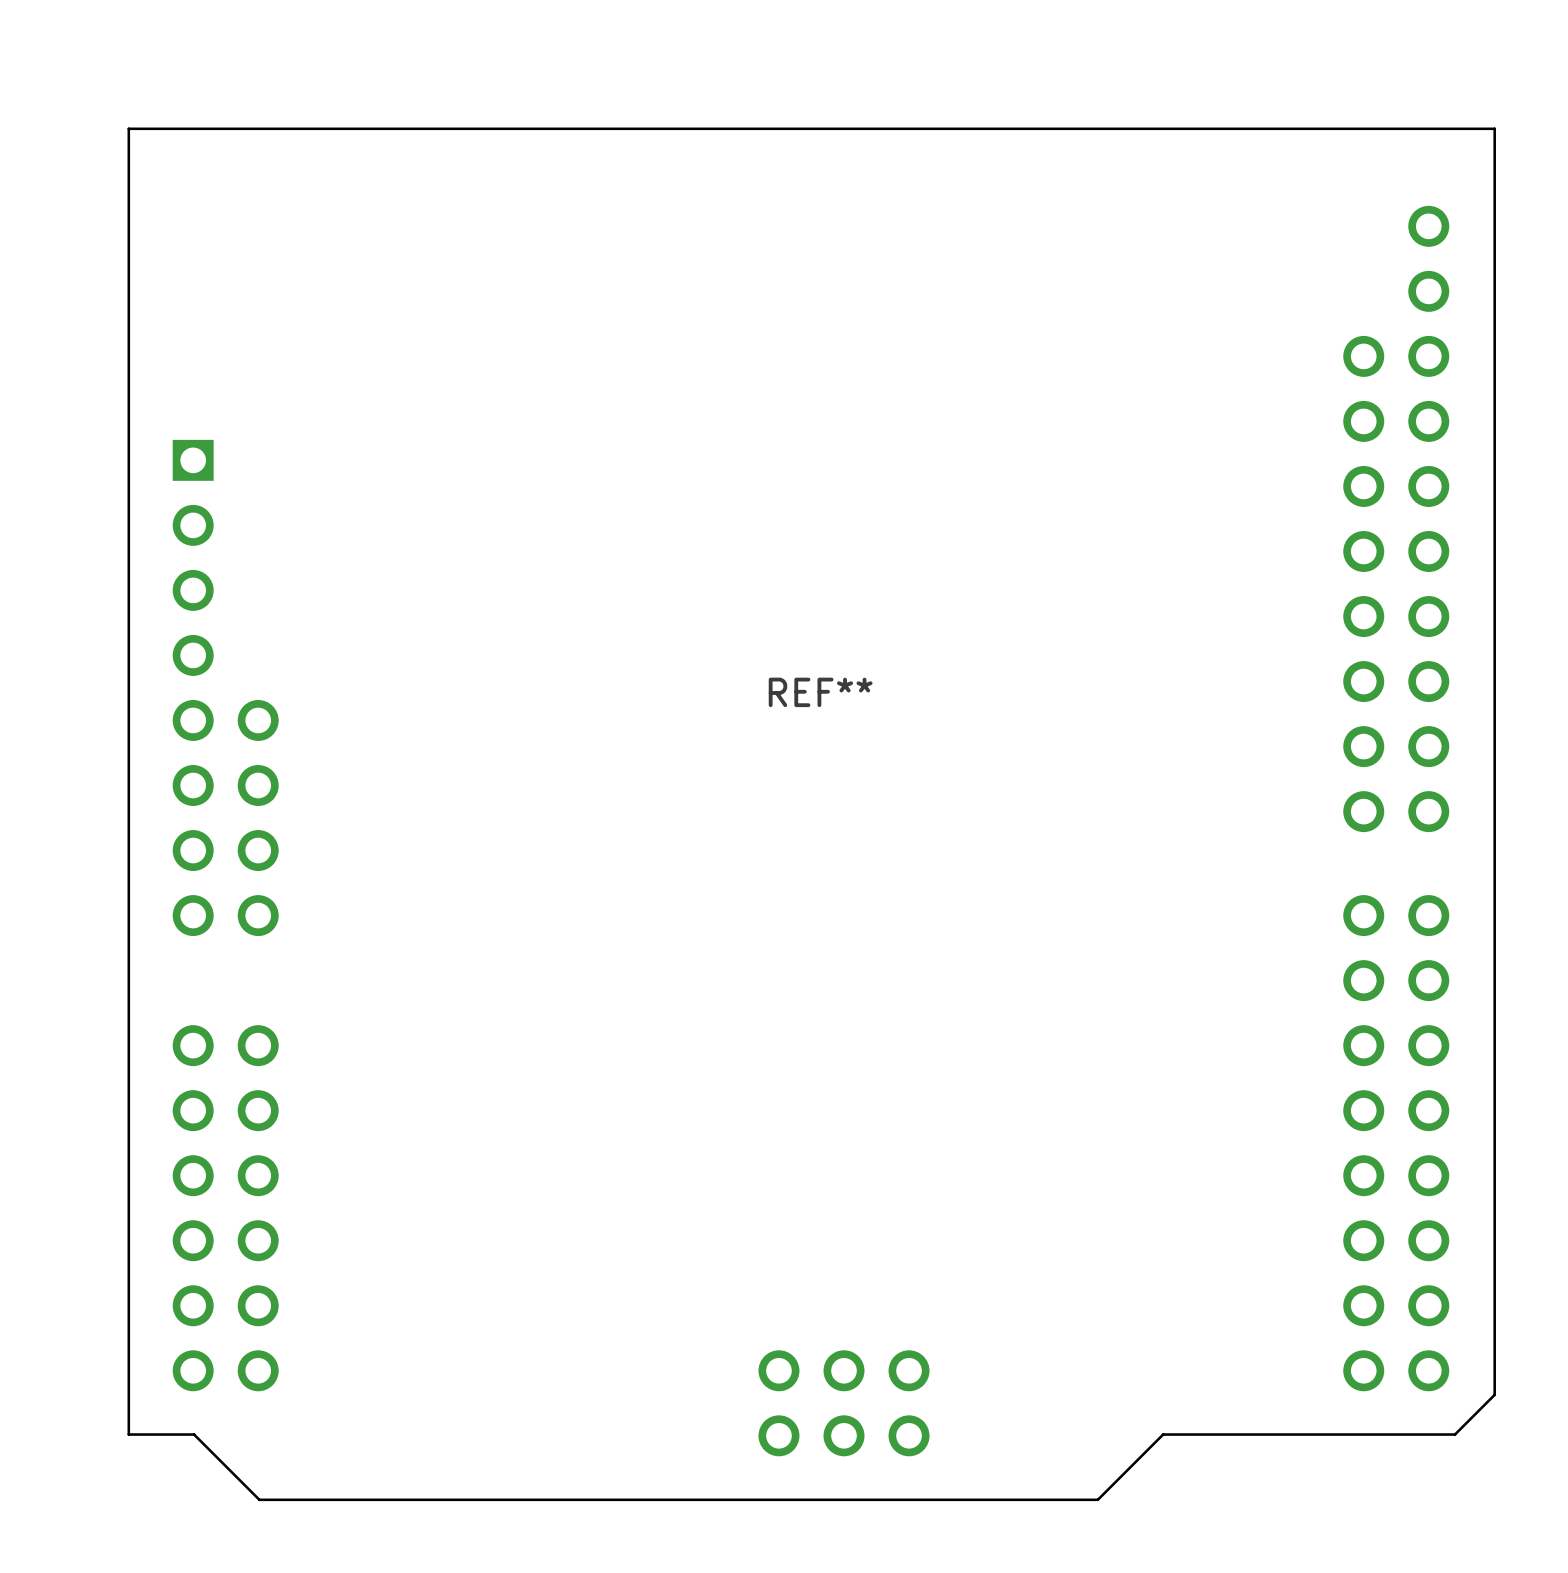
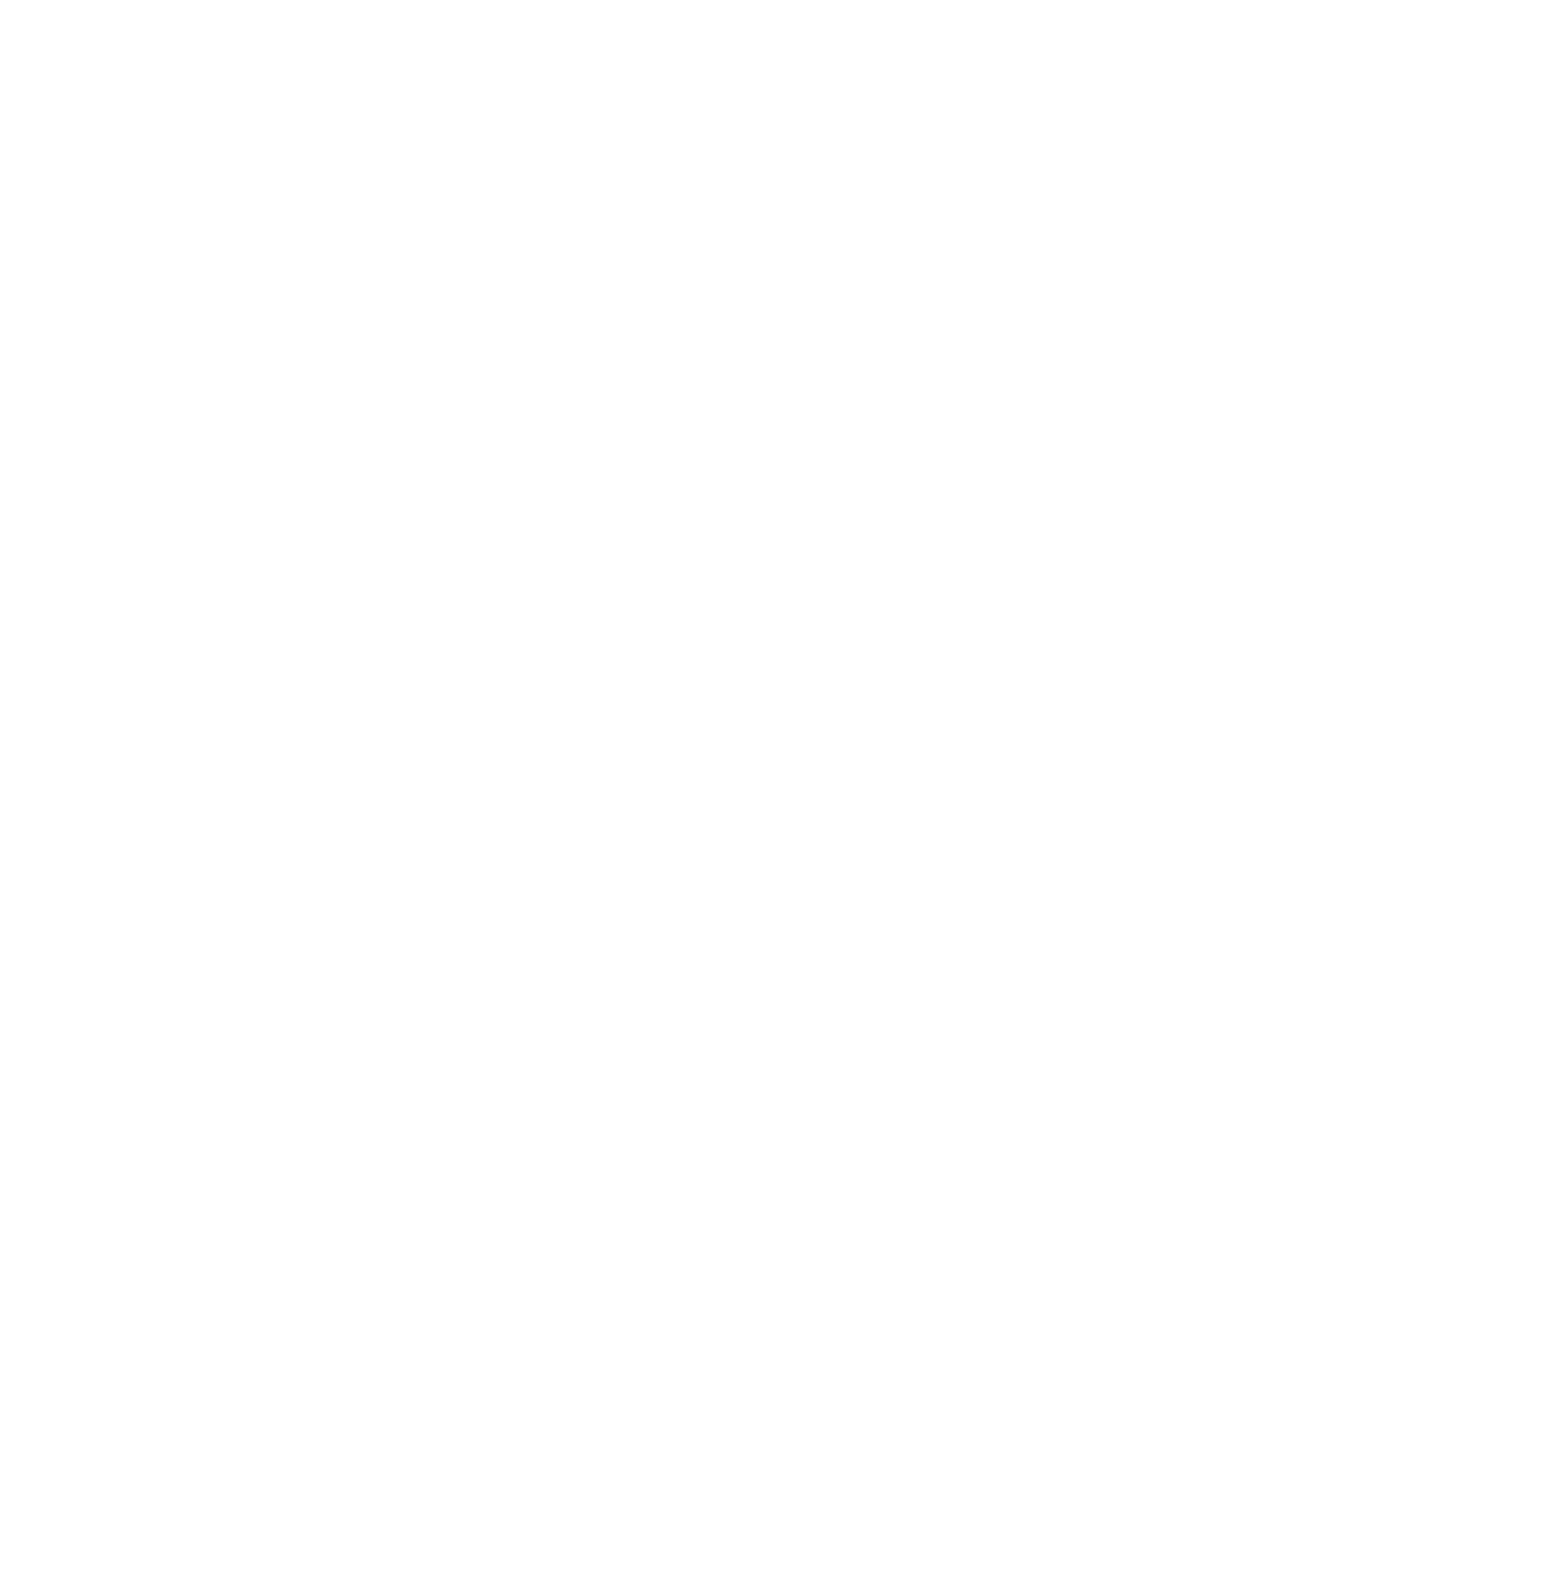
board edge: (128, 128) (128, 1434) (194, 1434) (259, 1499) (1097, 1499) (1163, 1434) (1455, 1434) (1494, 1394) (1494, 128) (128, 128) -> none
REF**: (810, 831) -> none

